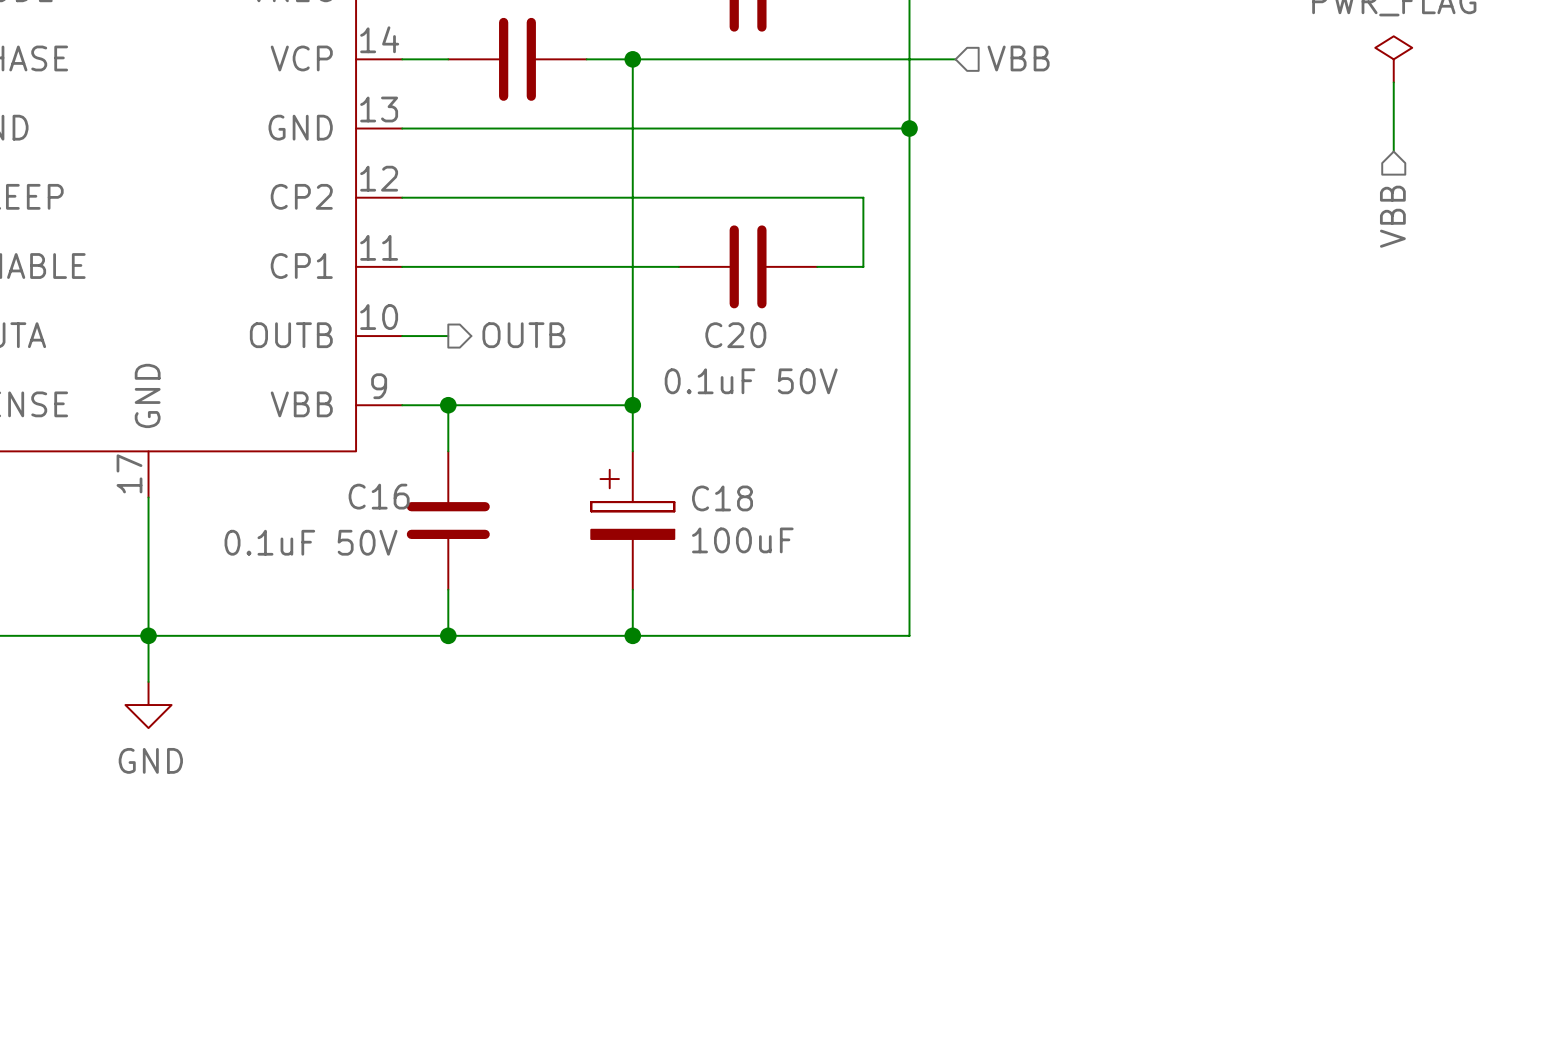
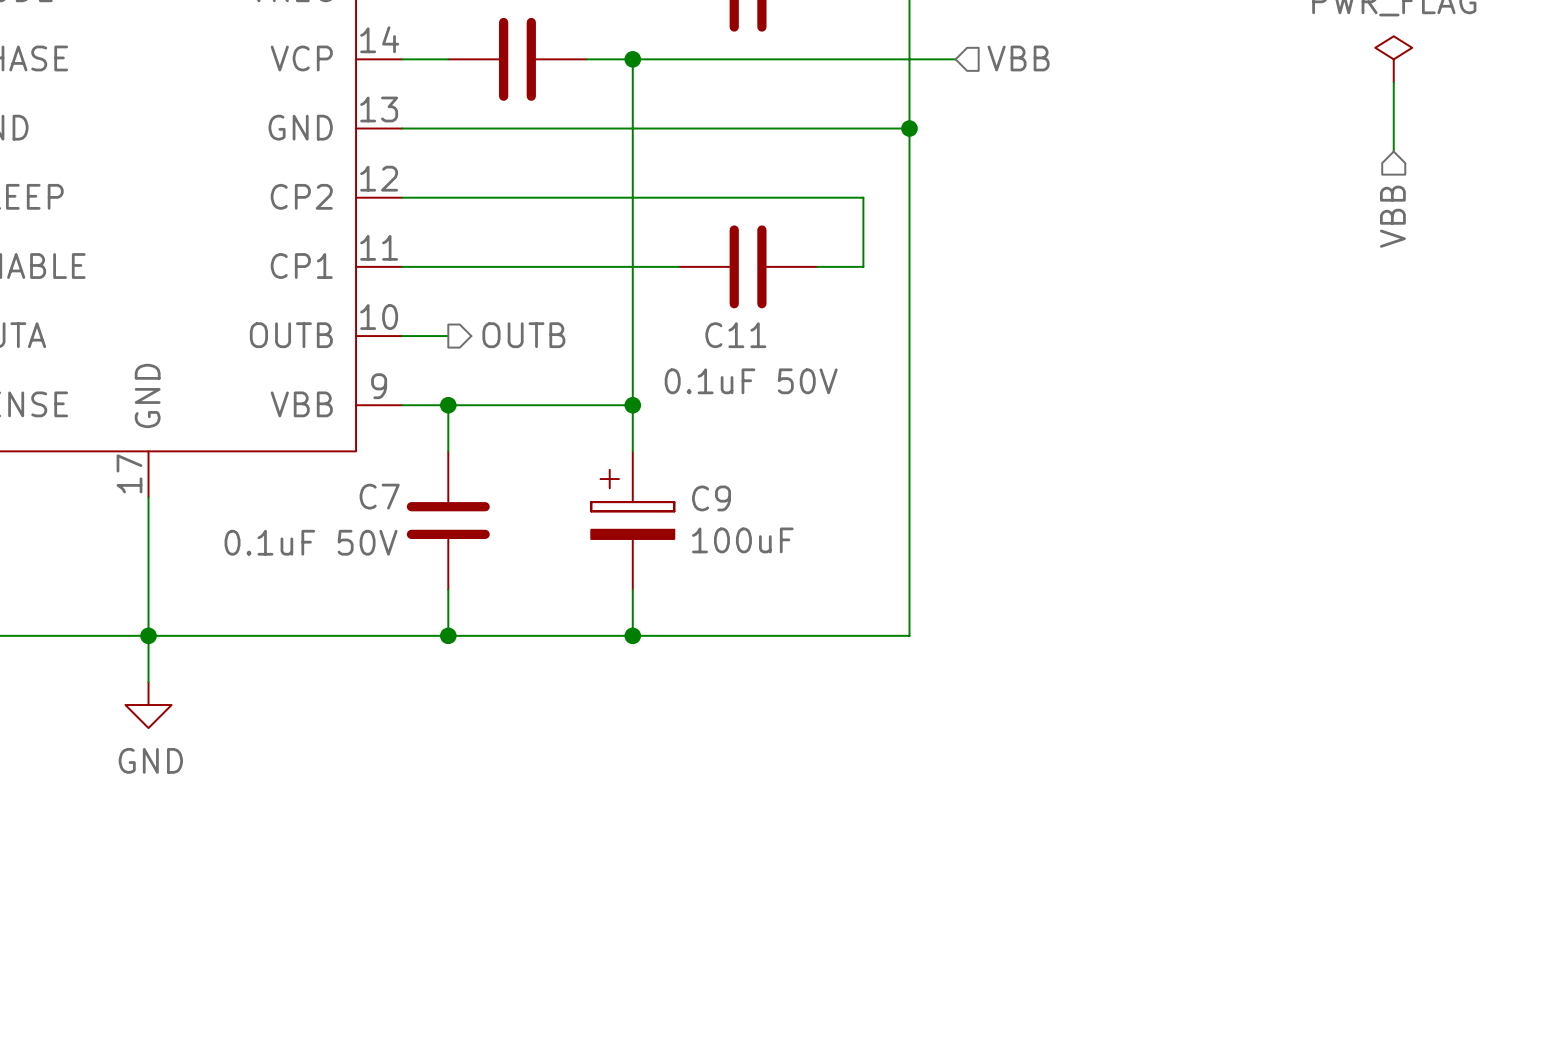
C20 name: C20 (735, 335) -> C11 (735, 335)
C16 name: C16 (379, 496) -> C7 (379, 496)
C18 name: C18 (722, 498) -> C9 (711, 498)

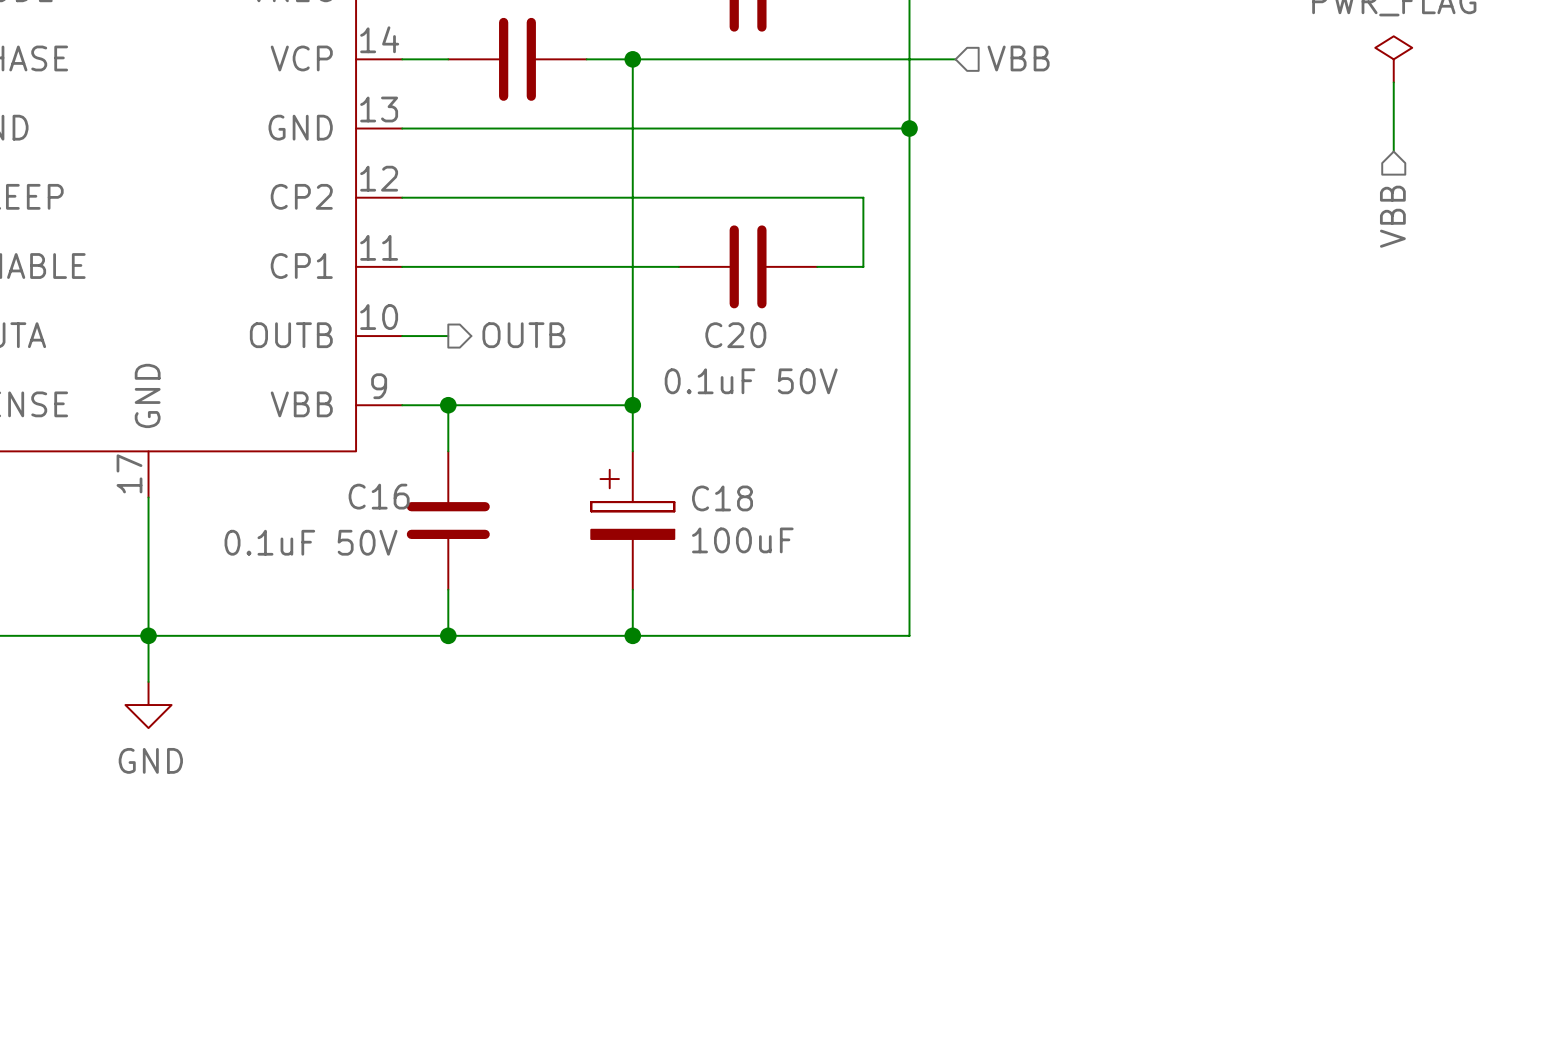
C11 name: C11 (735, 335) -> C20 (735, 335)
C7 name: C7 (379, 496) -> C16 (379, 496)
C9 name: C9 (711, 498) -> C18 (722, 498)

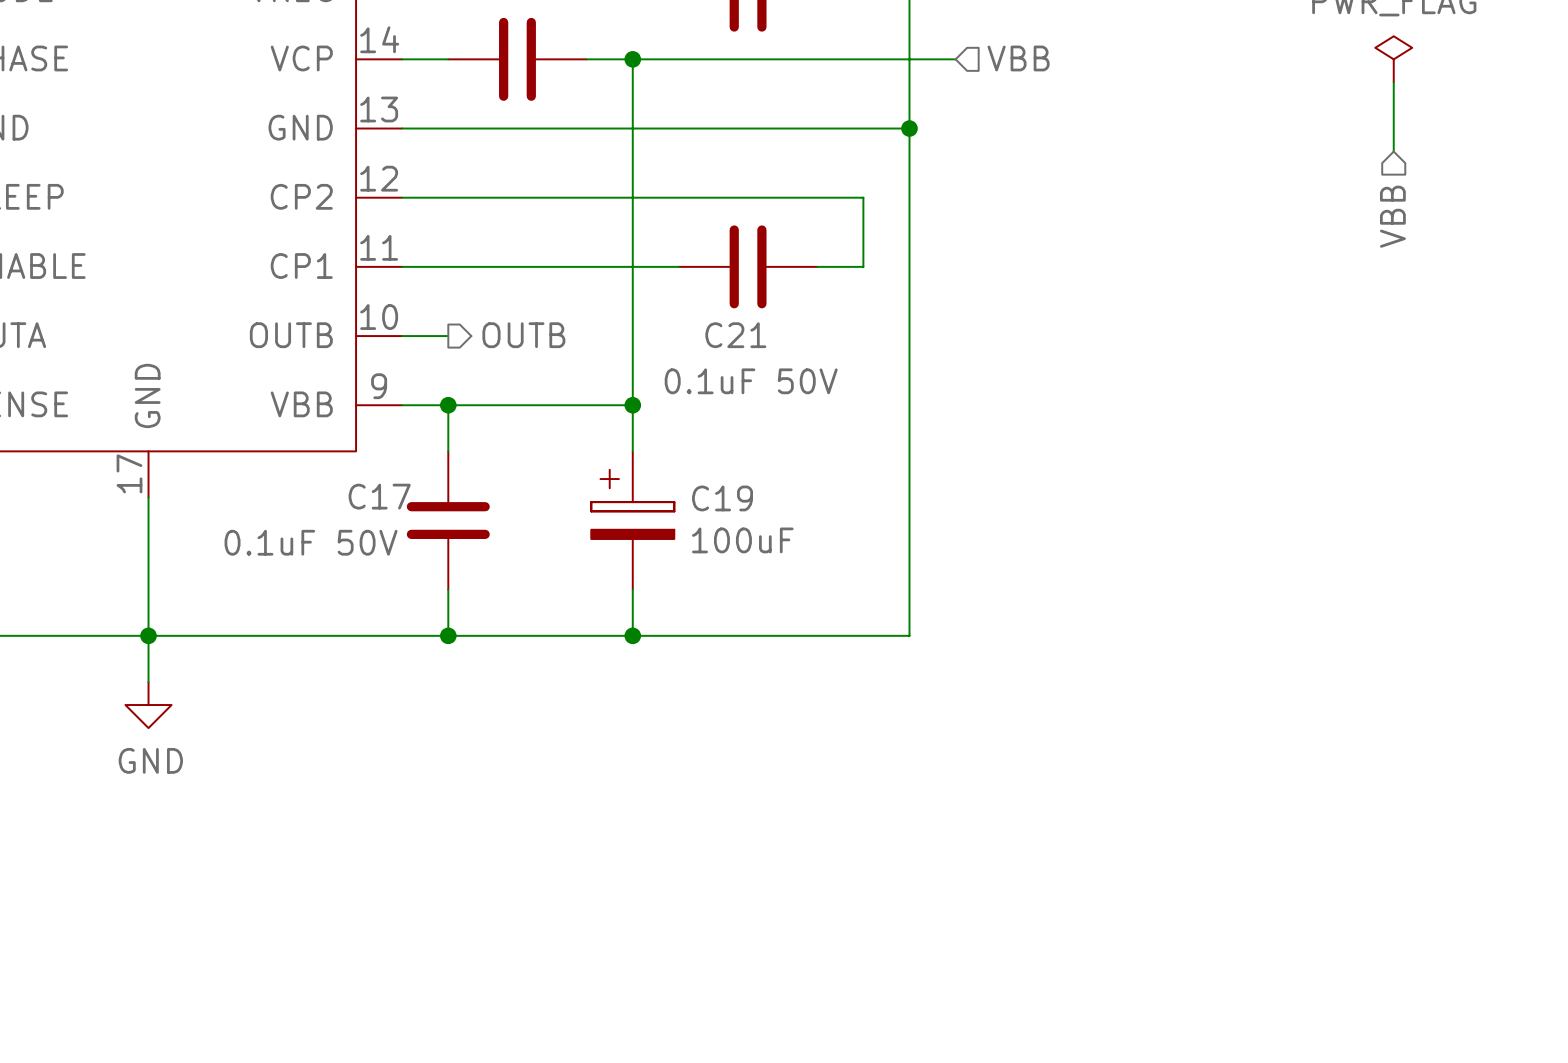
C20 name: C20 (735, 335) -> C21 (735, 335)
C16 name: C16 (379, 496) -> C17 (379, 496)
C18 name: C18 (722, 498) -> C19 (722, 498)

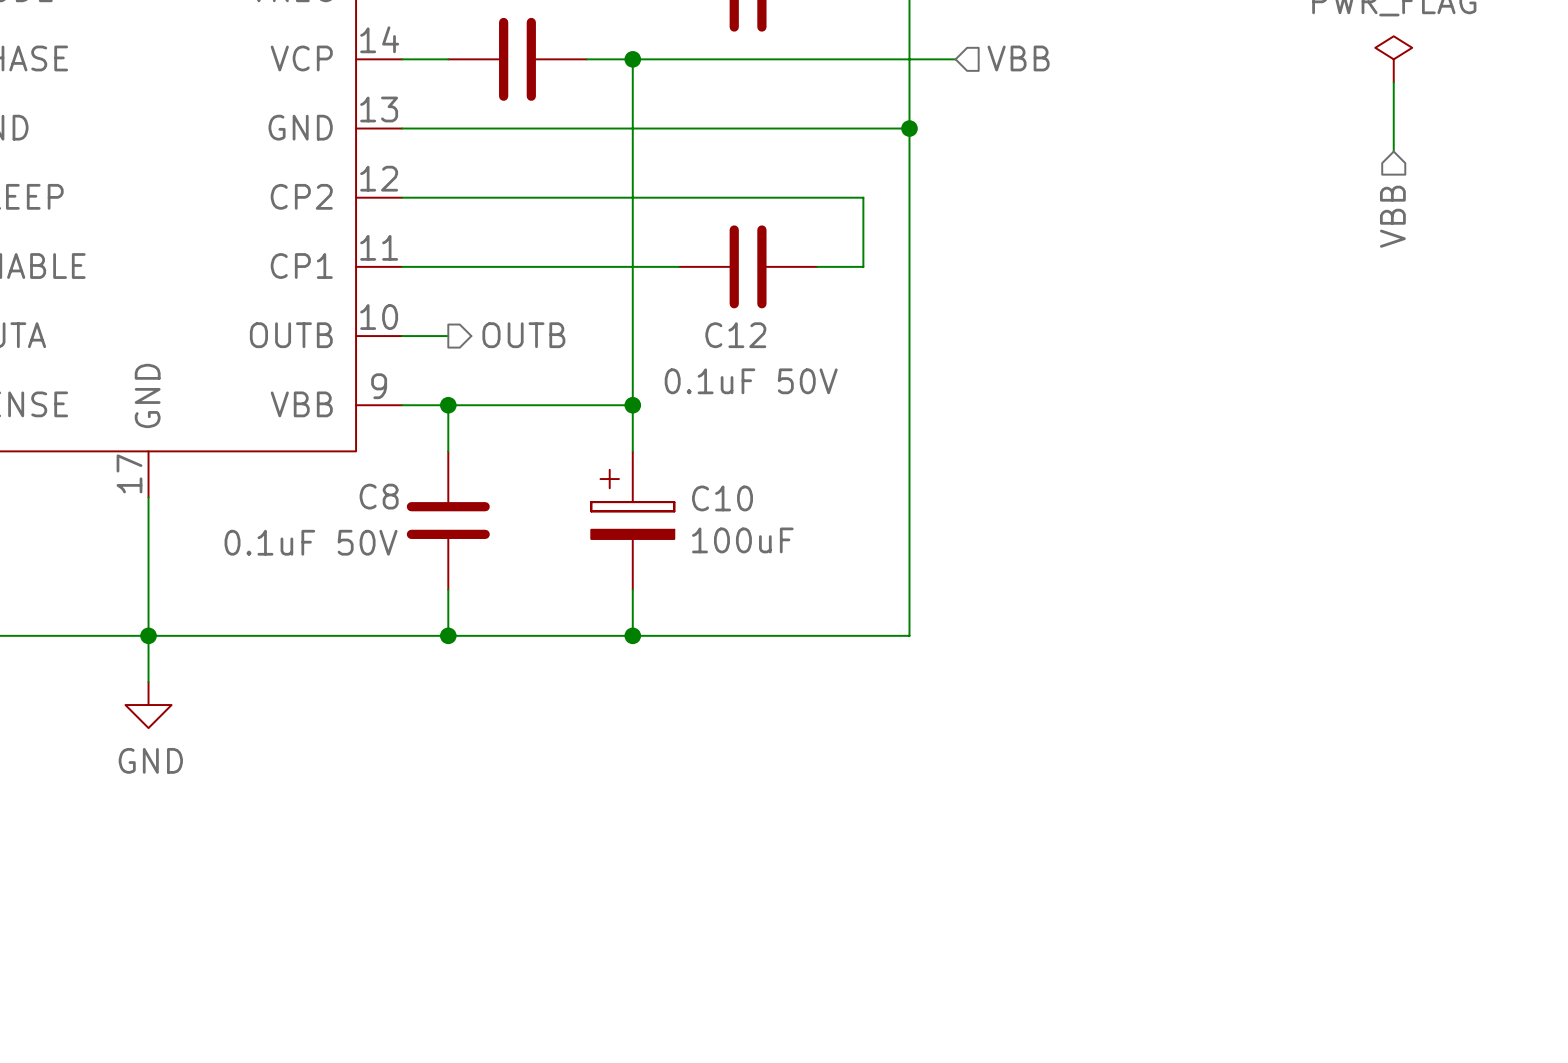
C21 name: C21 (735, 335) -> C12 (735, 335)
C17 name: C17 (379, 496) -> C8 (379, 496)
C19 name: C19 (722, 498) -> C10 (722, 498)

